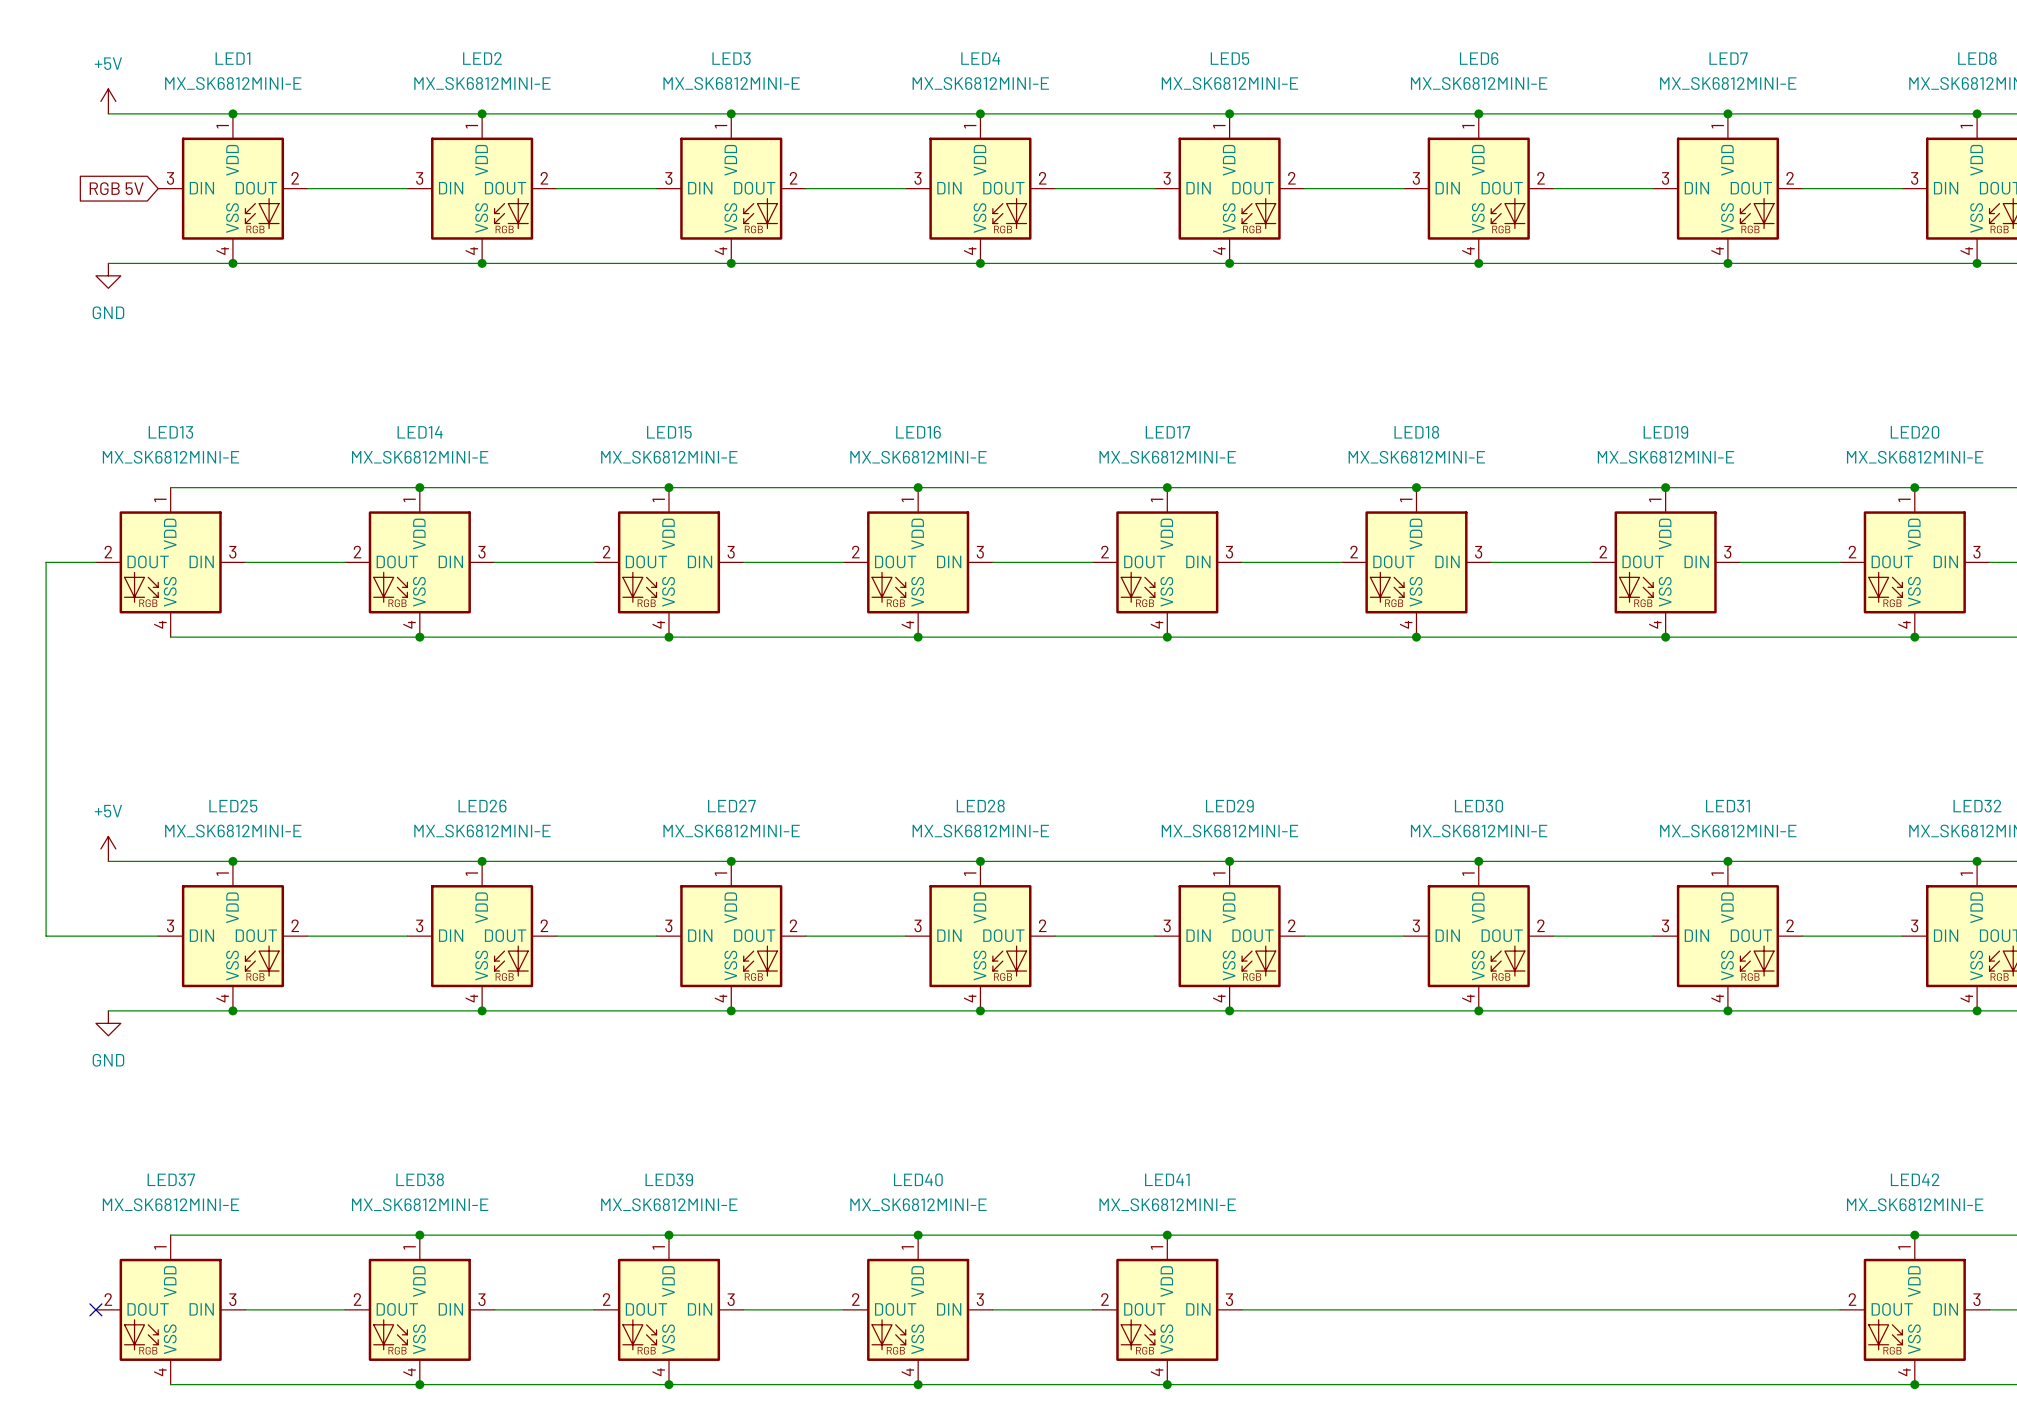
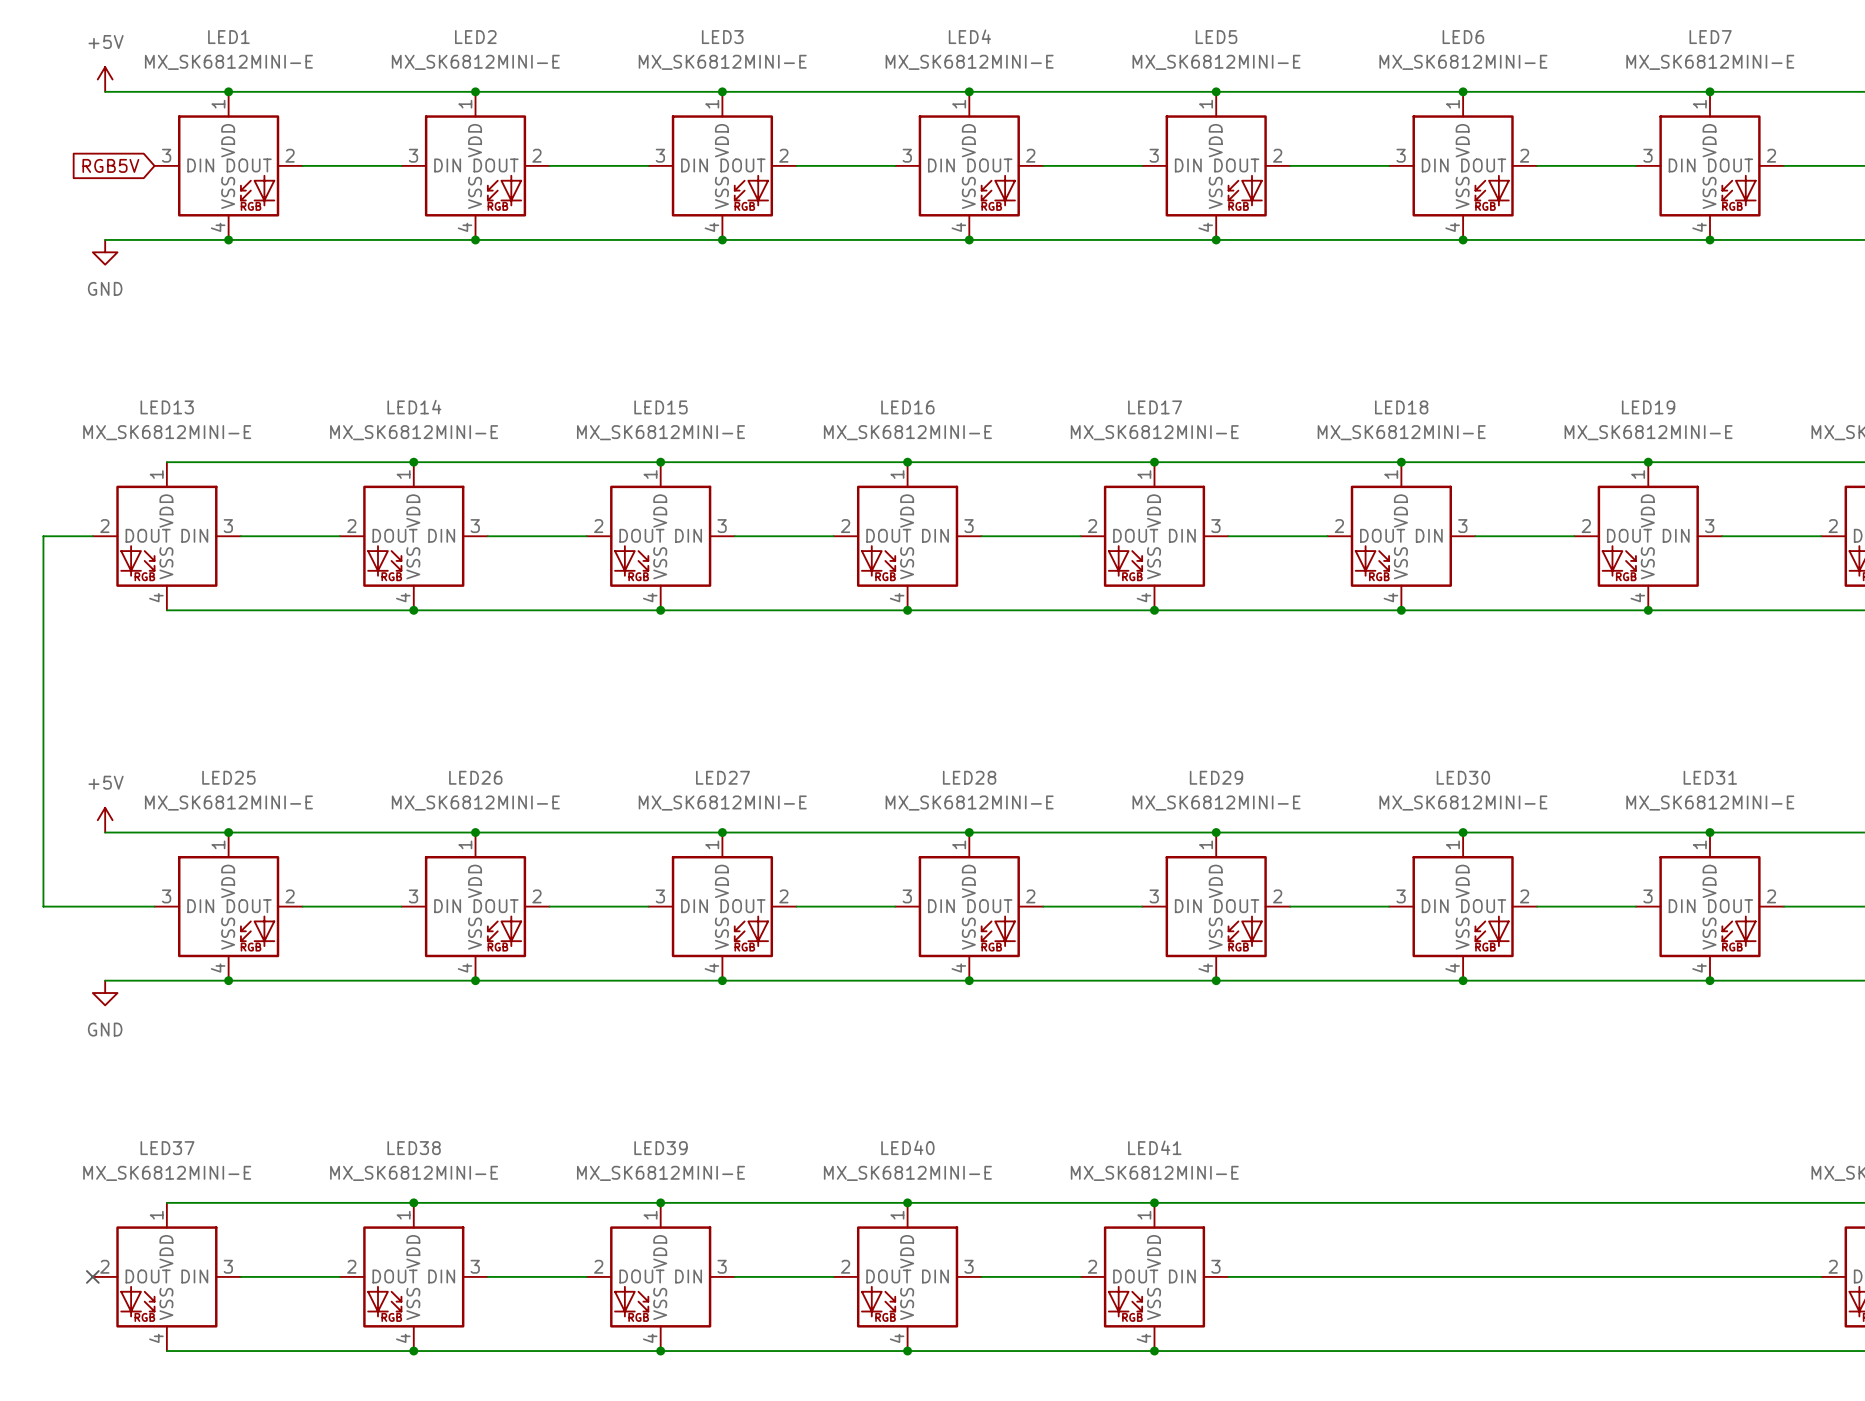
global label: RGB 5V (116, 188) -> RGB5V (110, 165)

